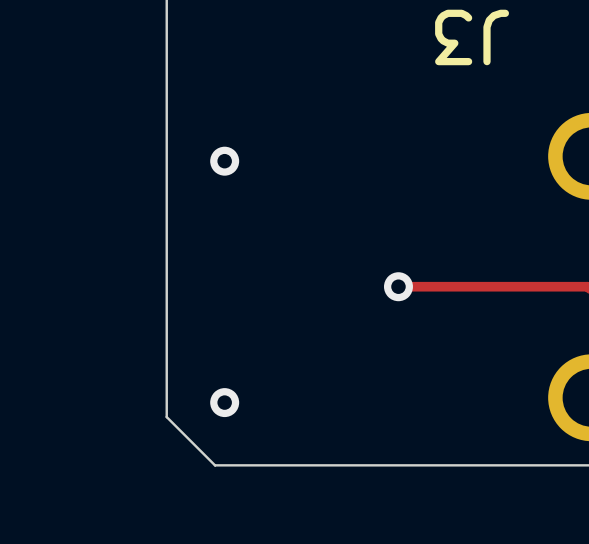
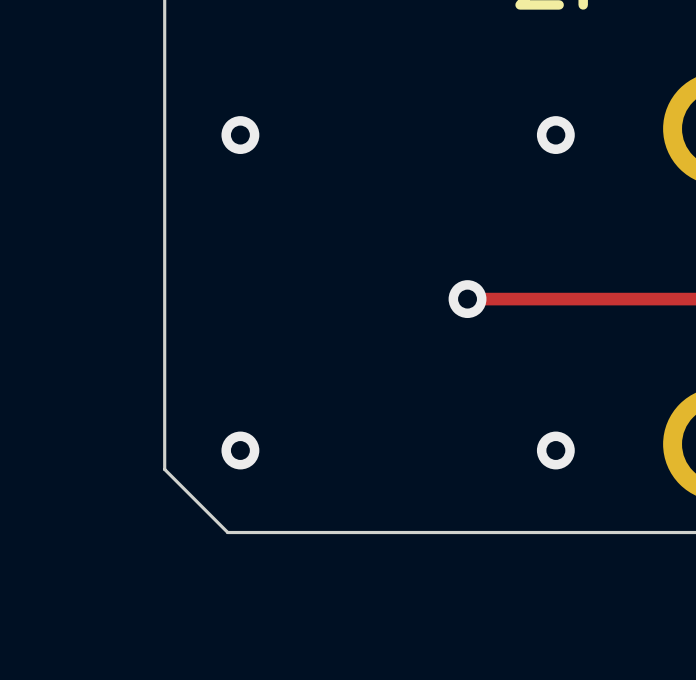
via: none -> (555, 135)
via: none -> (555, 450)

